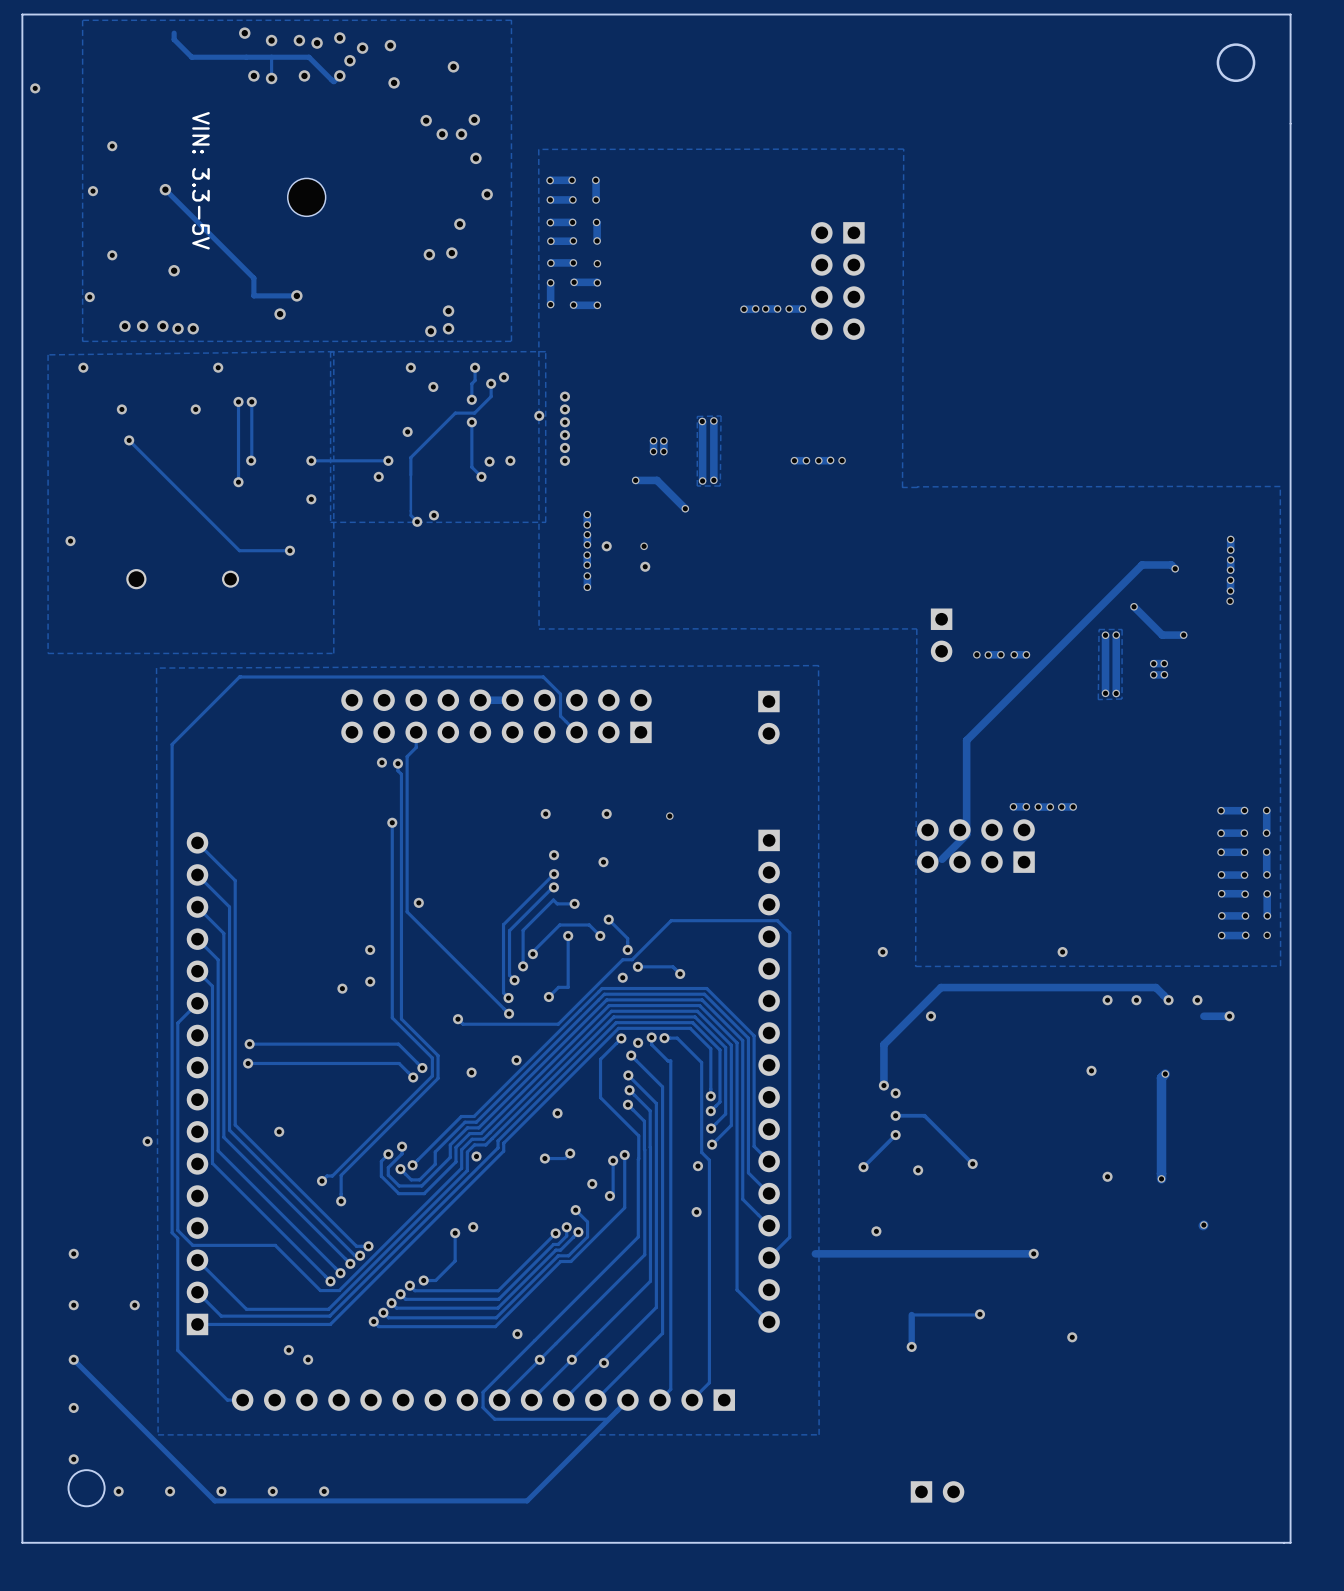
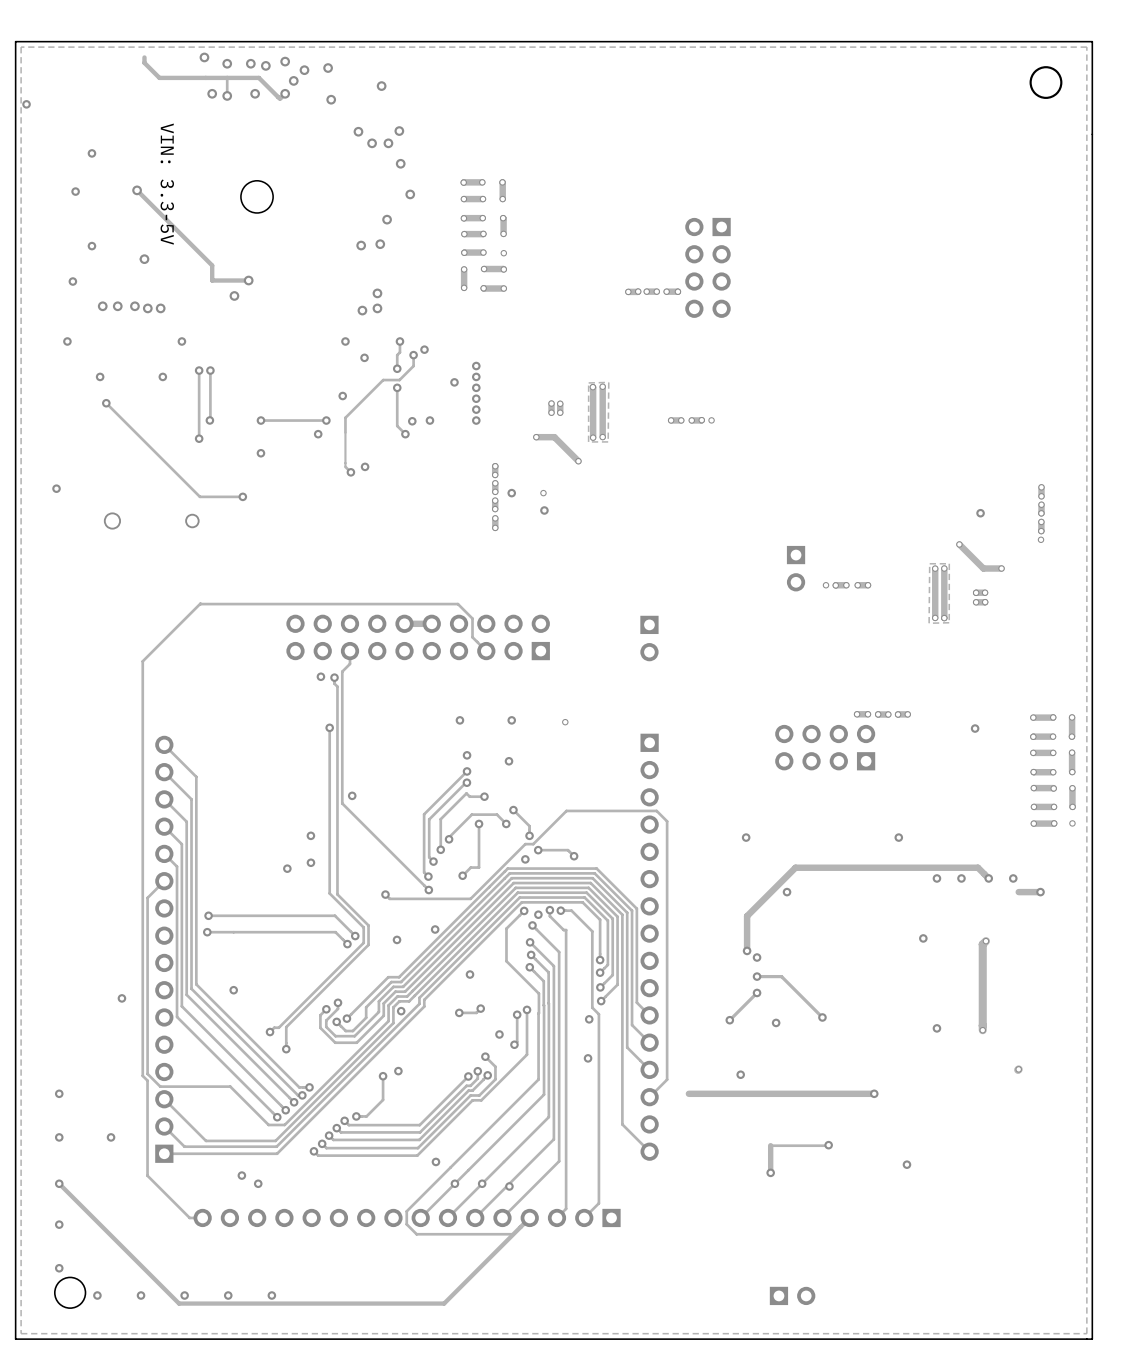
zone outline: (511, 20) (511, 341) (82, 341) (82, 20) (511, 20) -> none
zone outline: none -> (1086, 47) (21, 47) (21, 1333) (1086, 1333) (1086, 47)
zone outline: (333, 351) (48, 354) (48, 653) (333, 653) (333, 351) -> none
zone outline: (545, 351) (545, 522) (330, 522) (330, 351) (545, 351) -> none
track: (1175, 568) (1171, 564) (1142, 564) (966, 740) (966, 834) (942, 859) -> none
via: (1175, 568) -> none
via: none -> (980, 513)
zone outline: (758, 628) (539, 629) (538, 149) (903, 149) (902, 487) (1280, 486) (1280, 966) (915, 966) (916, 628) (758, 629) -> none
zone outline: (818, 665) (819, 1434) (158, 1434) (156, 668) (818, 665) -> none
via: none -> (975, 728)

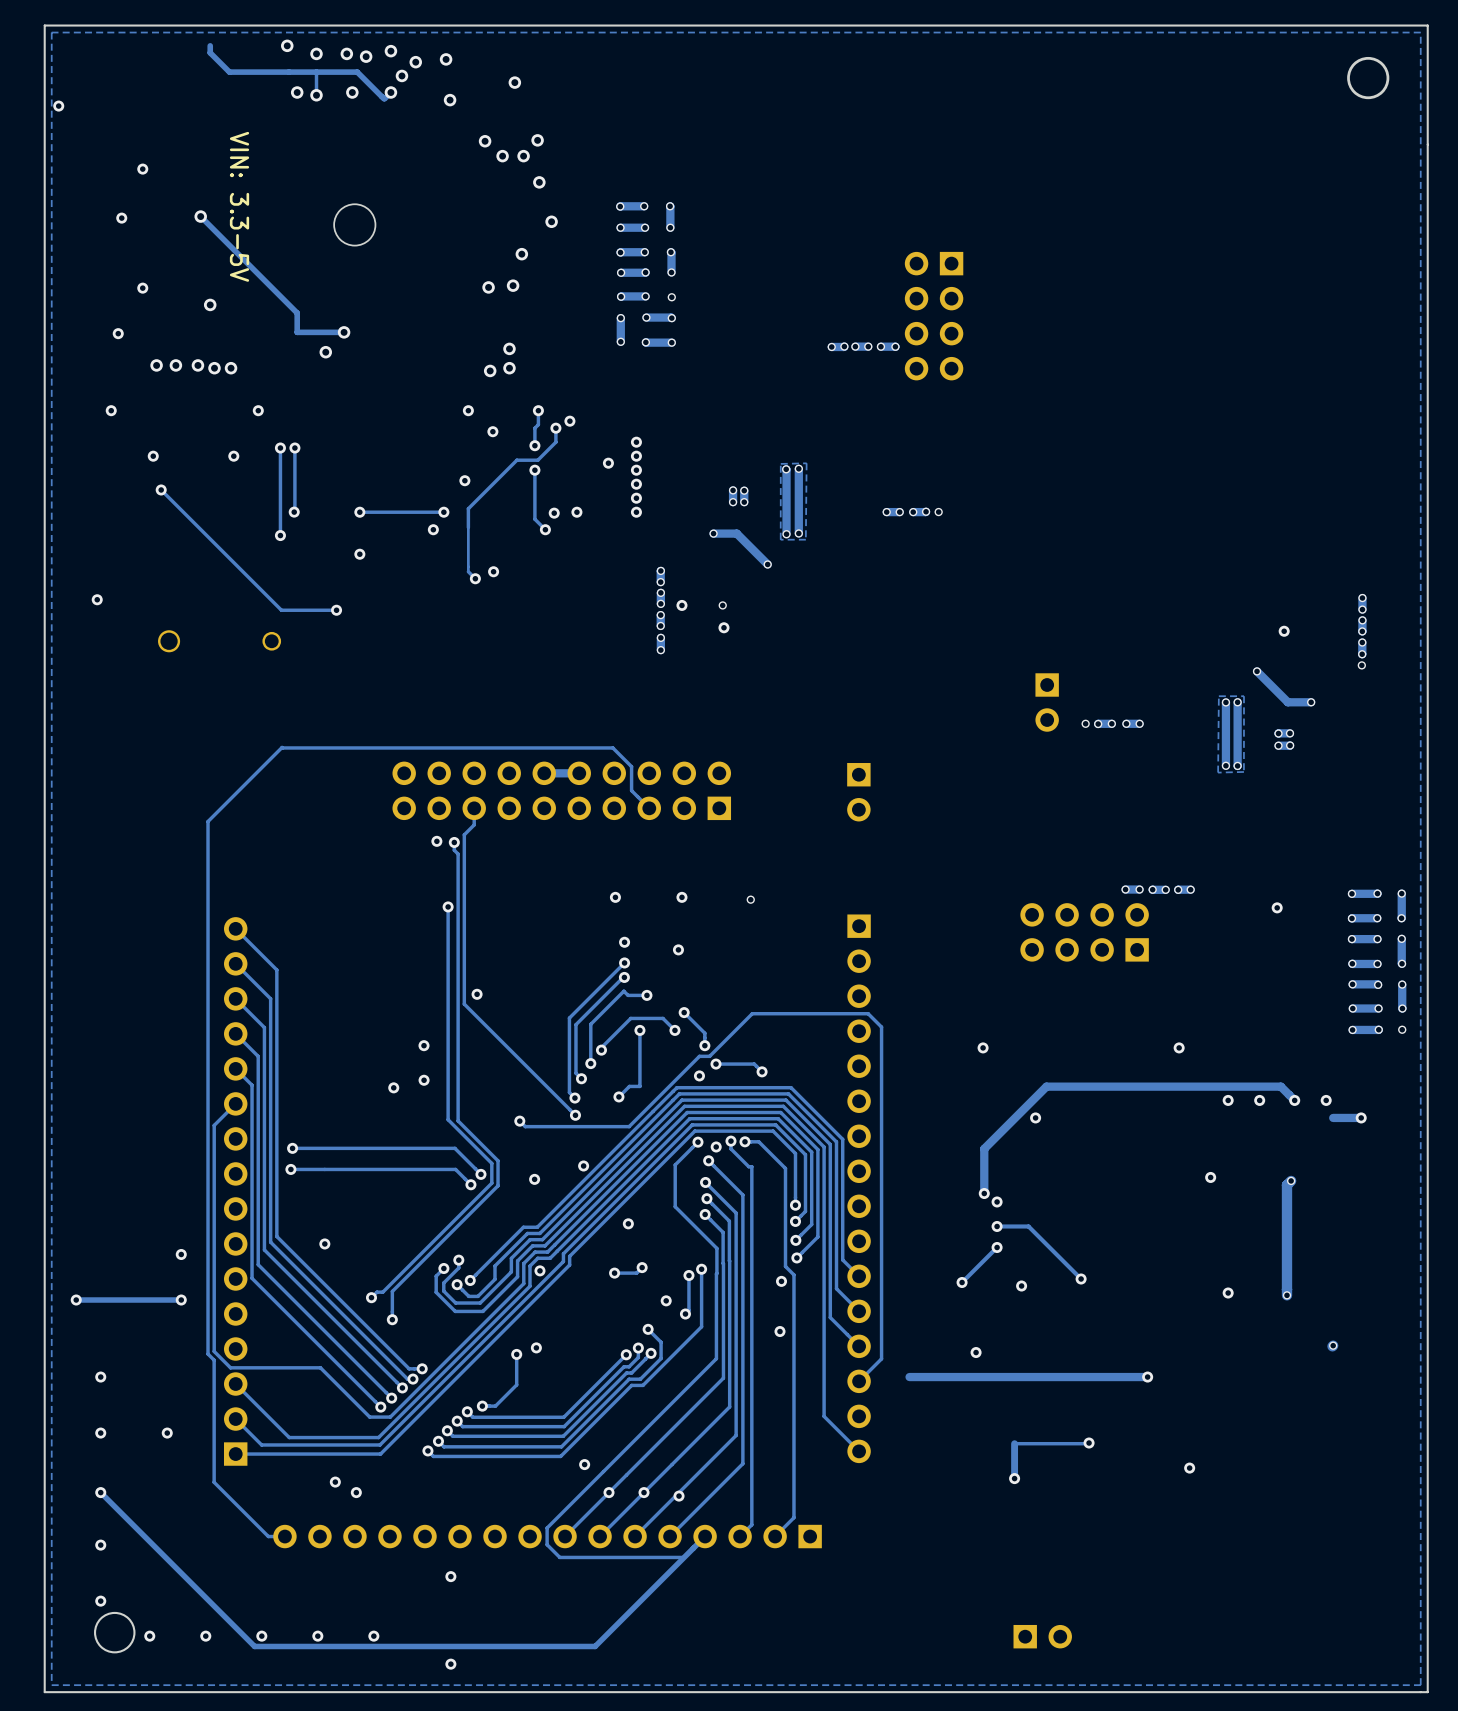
via: none -> (76, 1300)
track: none -> (181, 1300) (76, 1300)
via: none -> (181, 1300)
via: none -> (450, 1576)
via: none -> (450, 1664)

